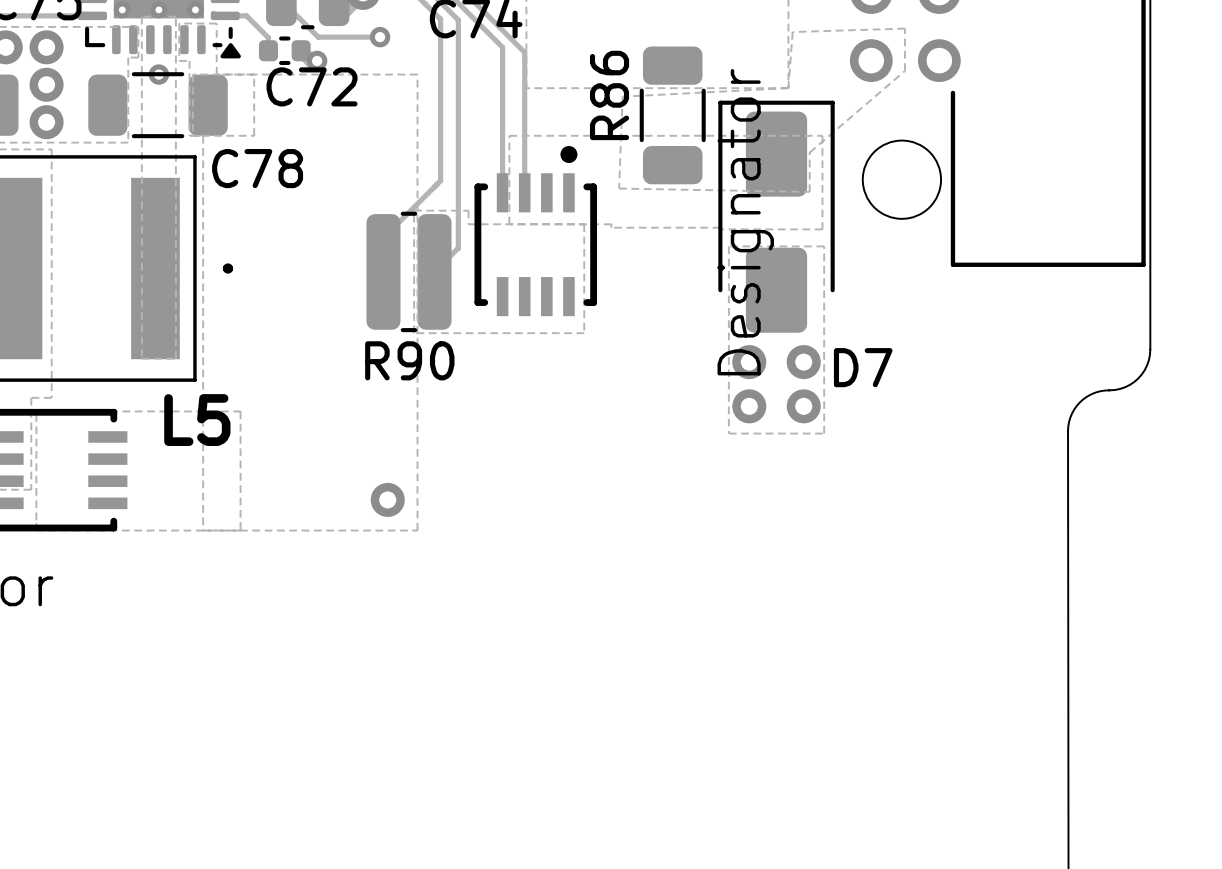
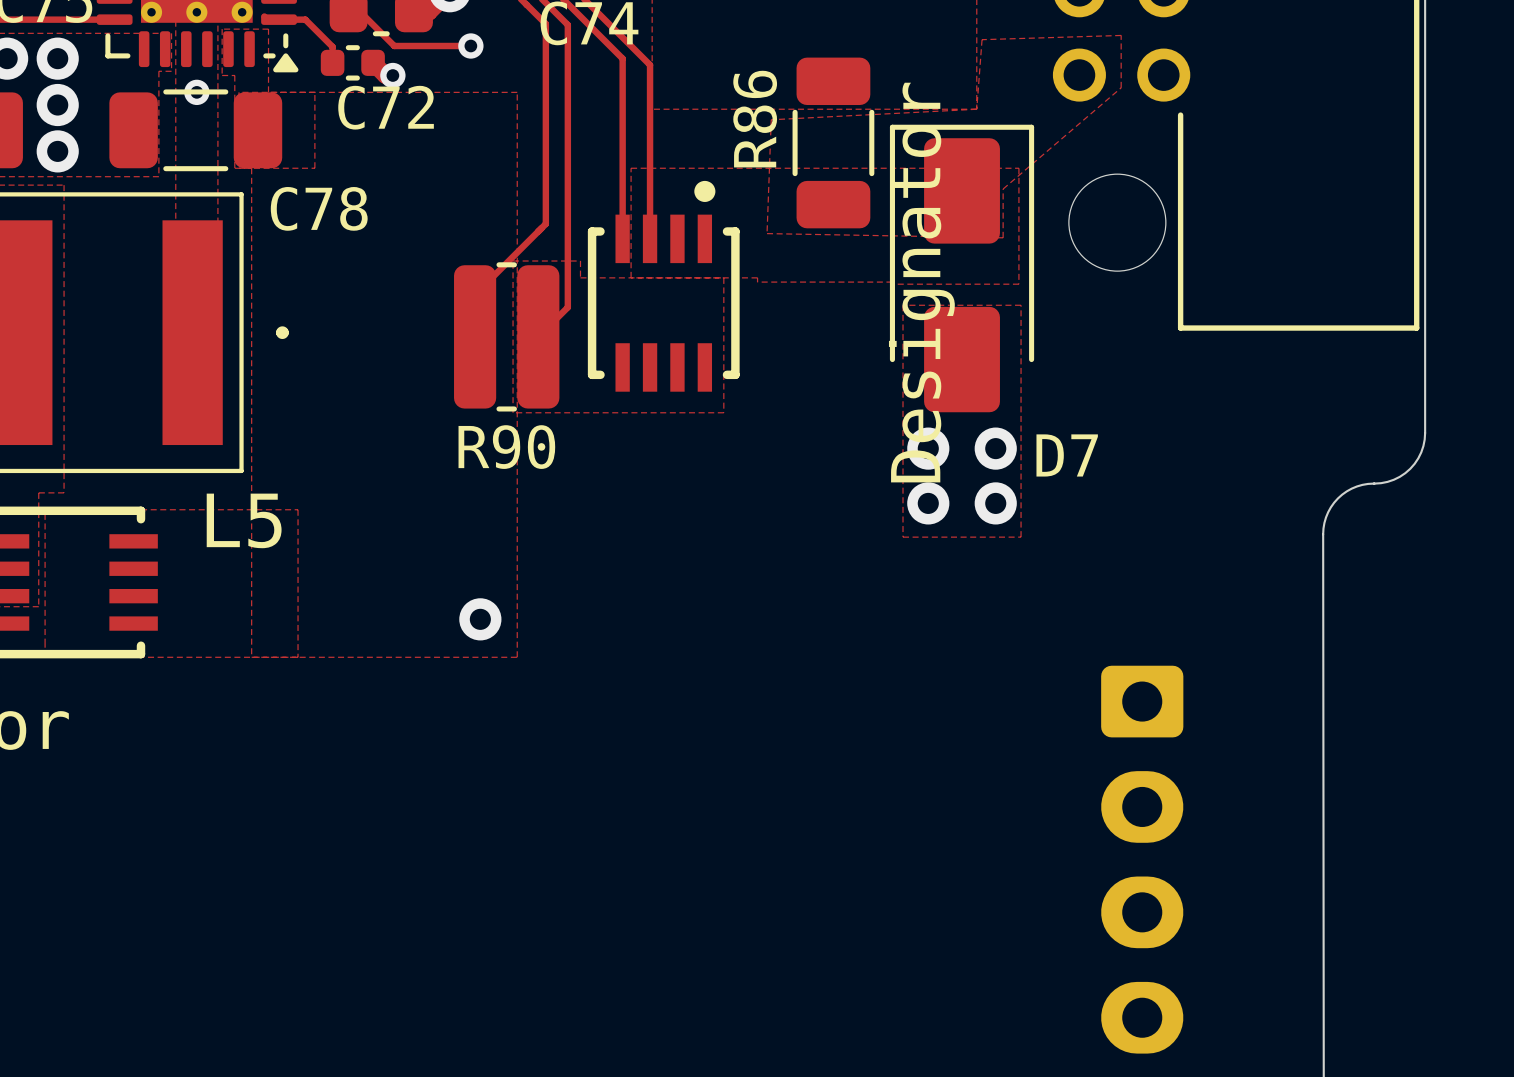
part: none -> (1142, 859)

